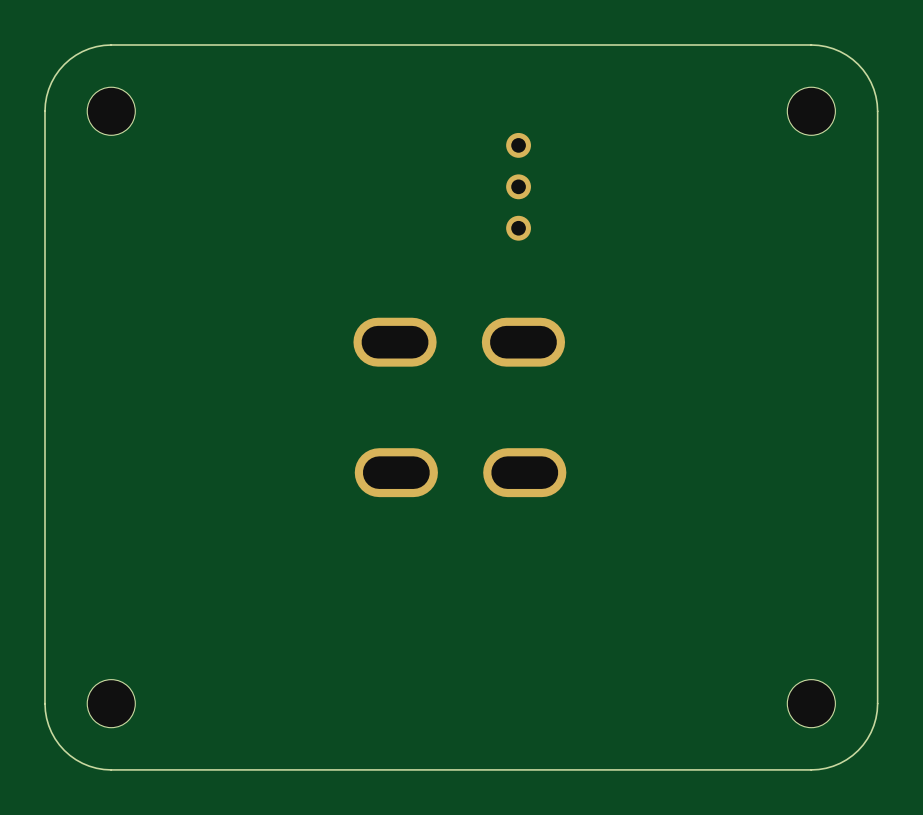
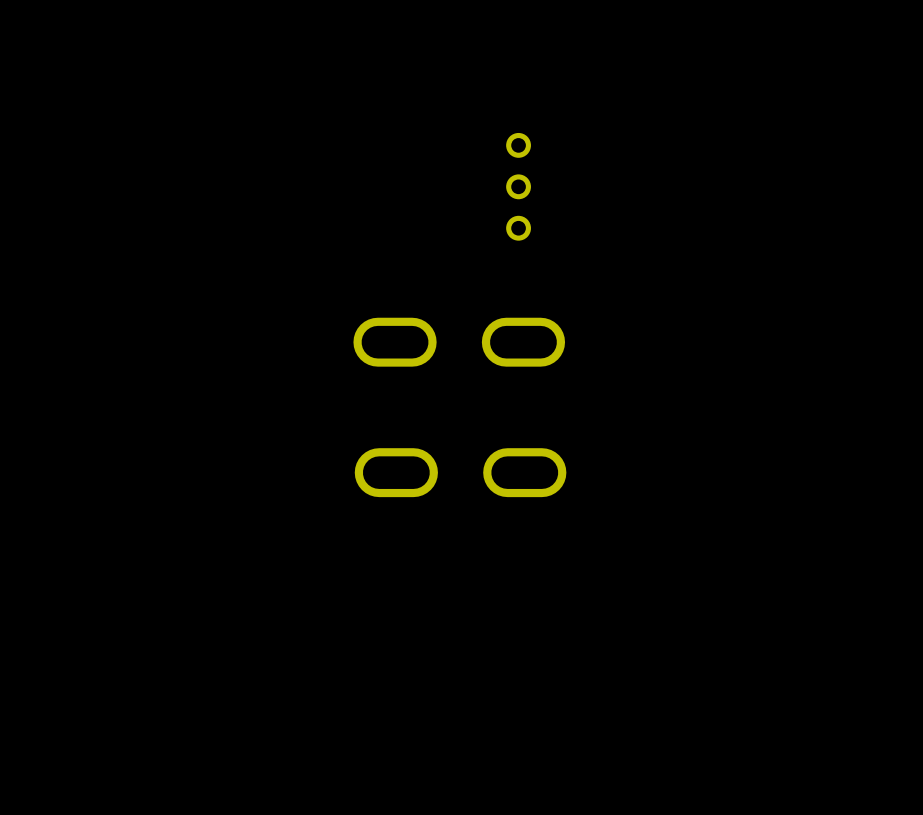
board edge: (811, 45) (111, 45) (96, 46) (82, 51) (64, 64) (51, 82) (46, 96) (45, 111) (45, 703) (46, 718) (51, 732) (64, 750) (82, 763) (96, 768) (111, 769) (811, 769) (833, 766) (846, 759) (858, 750) (867, 738) (873, 725) (877, 703) (877, 103) (871, 82) (858, 64) (840, 51) (826, 46) (811, 45) -> none
part: (111, 111) -> none
part: (811, 111) -> none
part: (111, 703) -> none
part: (811, 703) -> none

